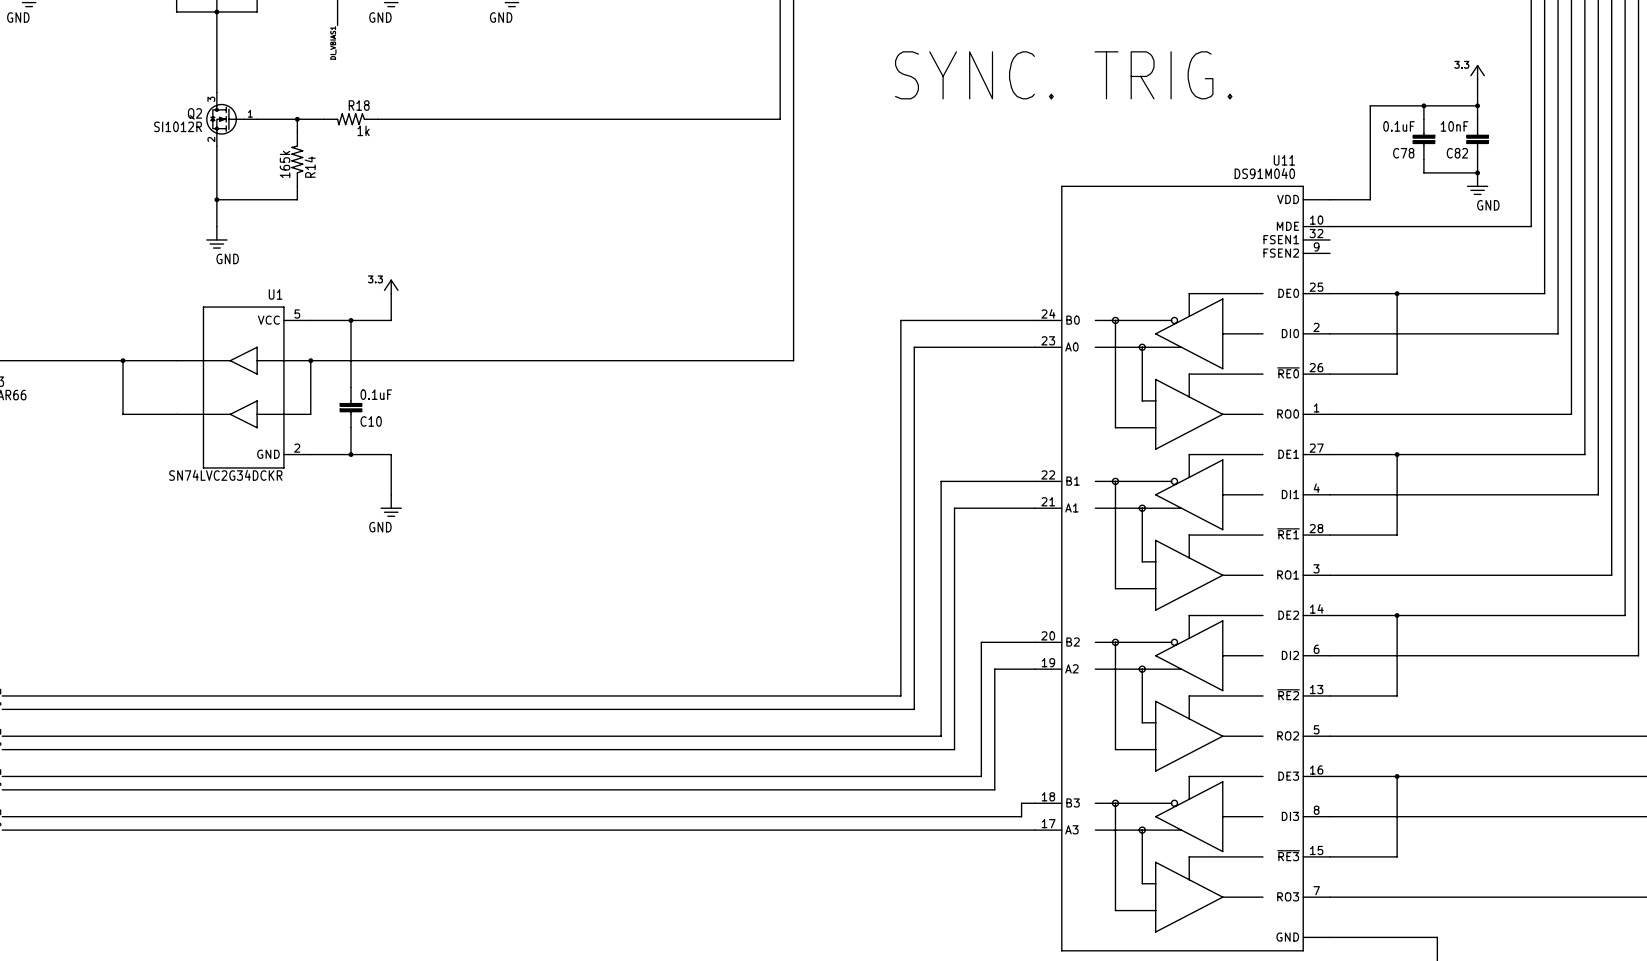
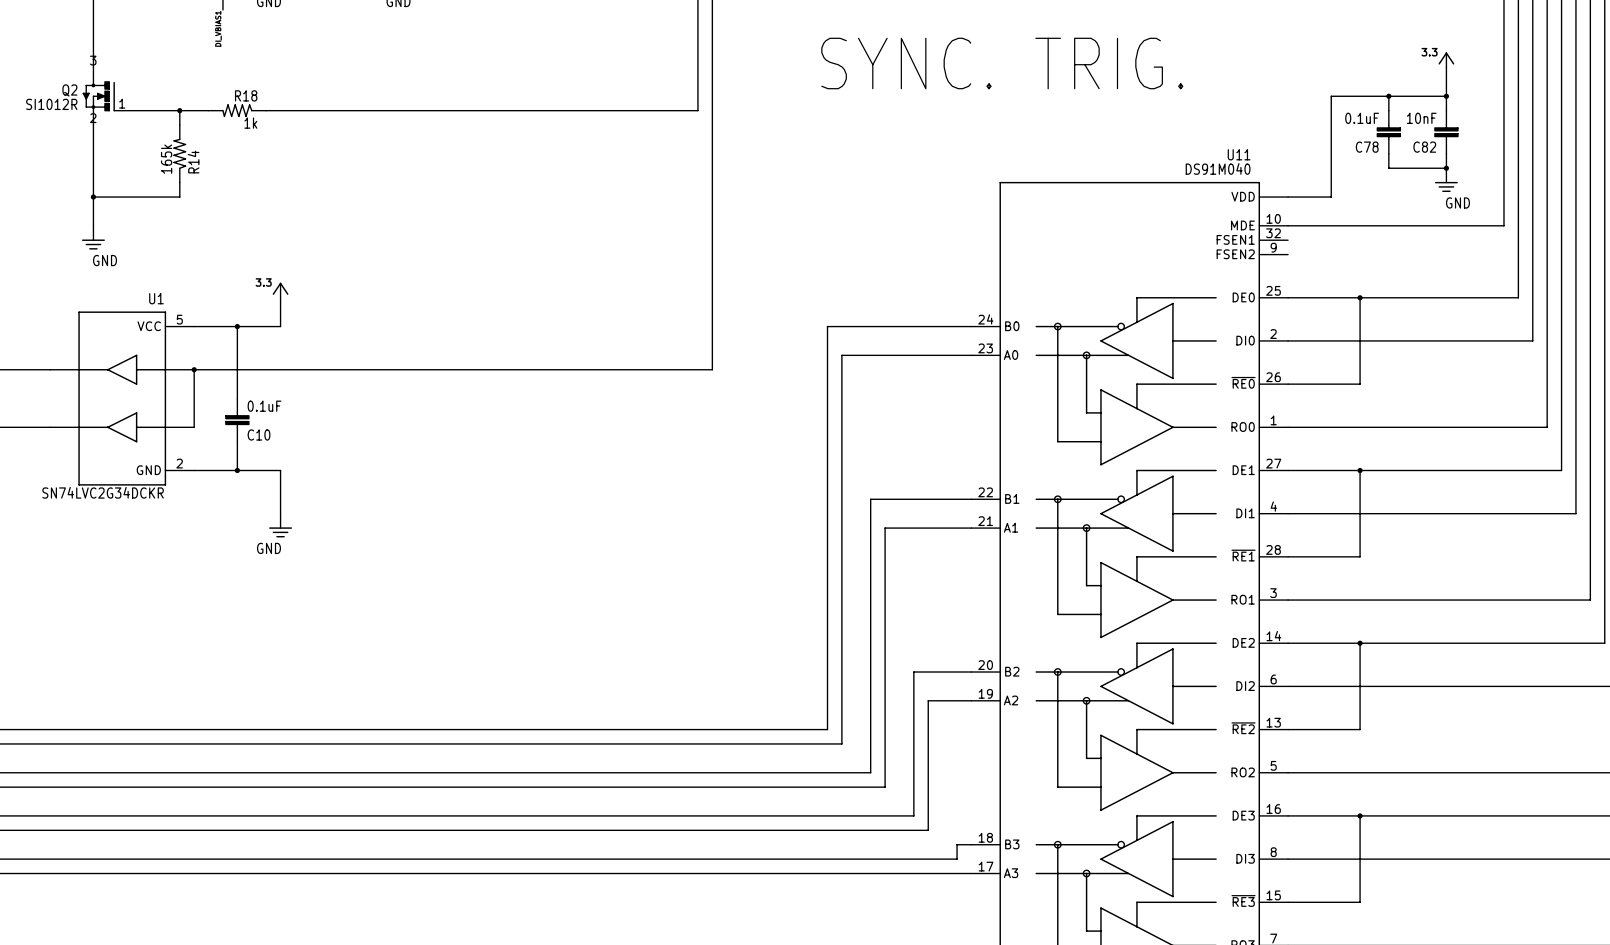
Q2 symbol: [206, 92, 258, 147] -> [82, 67, 123, 126]

